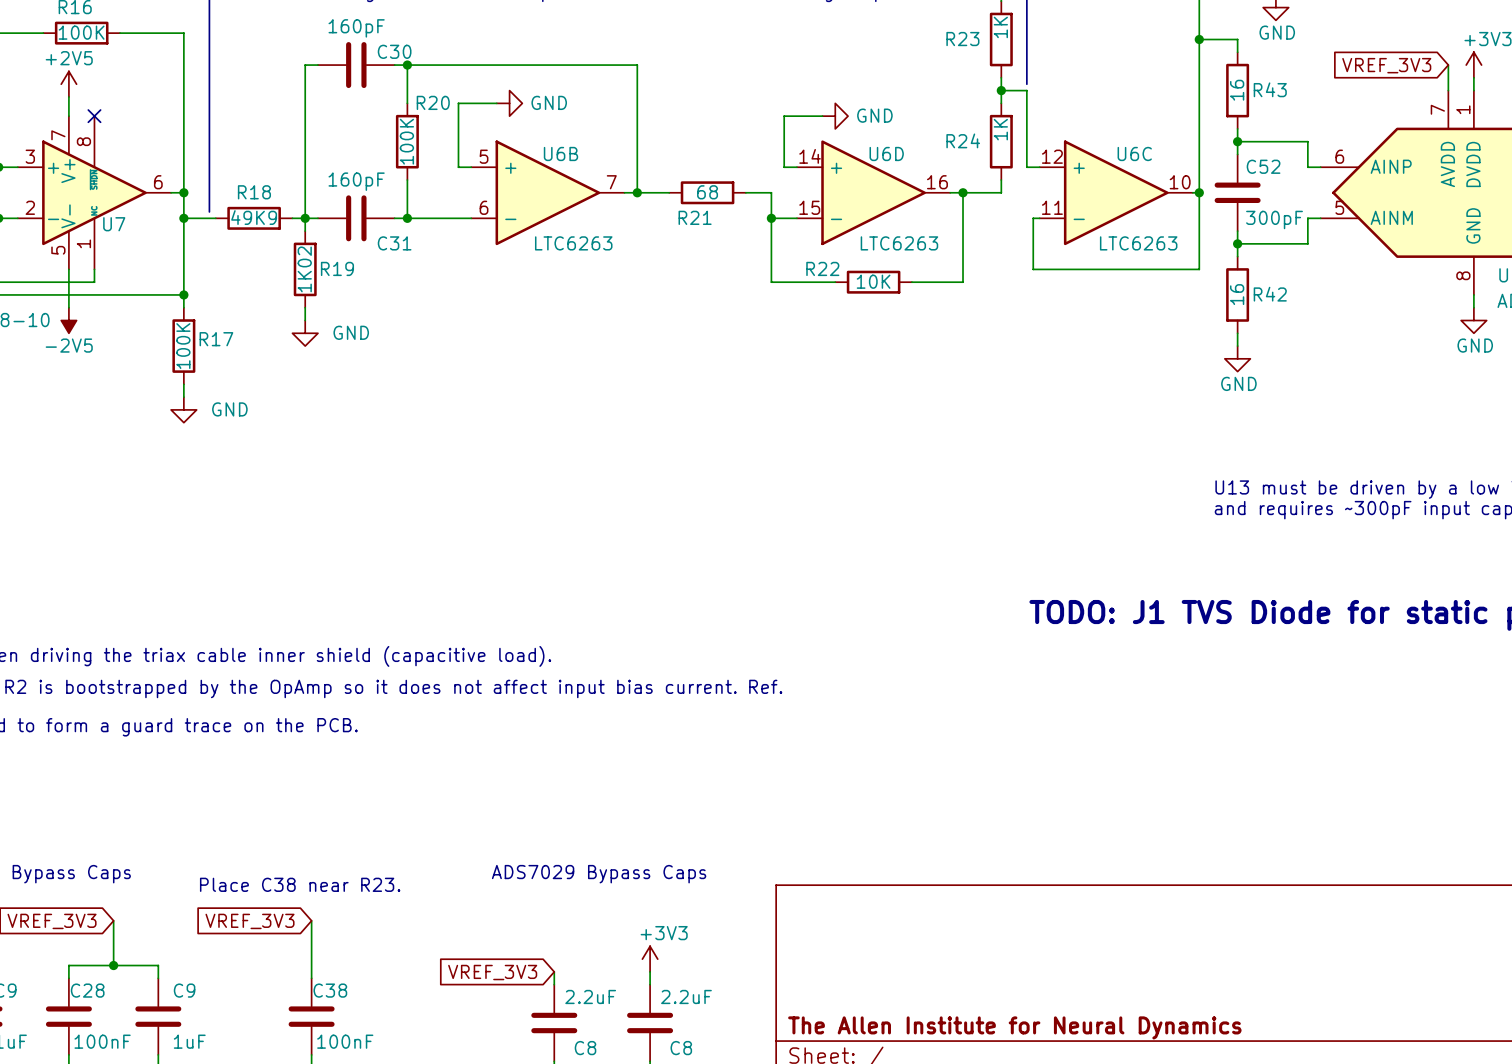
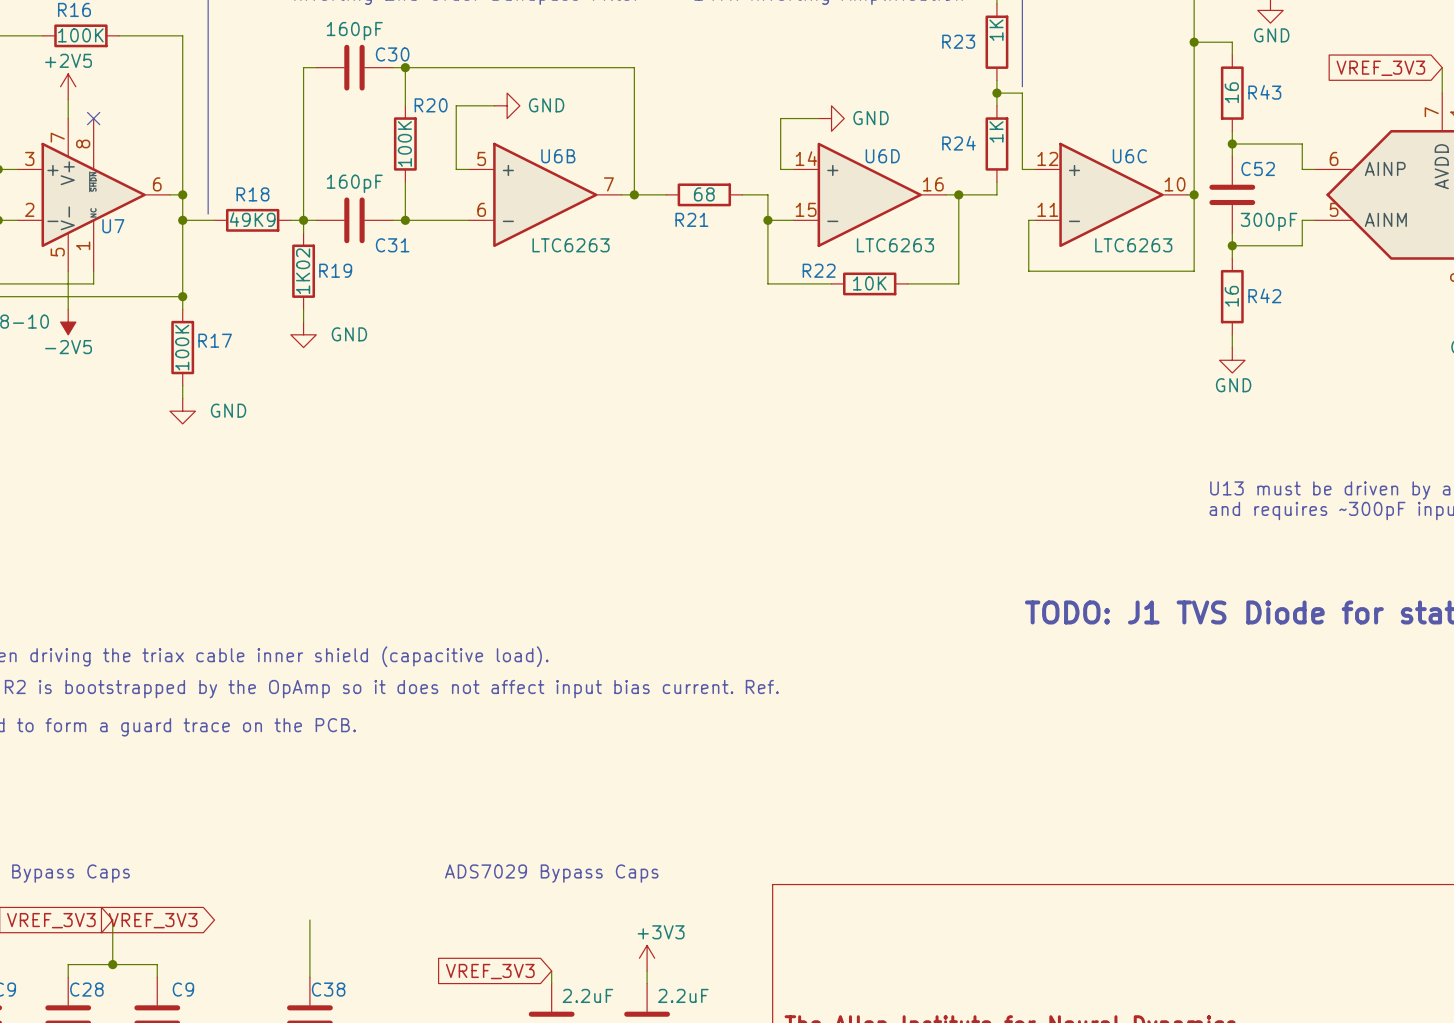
text position: ADS7029 Bypass Caps (599, 874) -> ADS7029 Bypass Caps (551, 873)
text: Place C38 near R23. (300, 884) -> none
global label position: VREF_3V3 (250, 921) -> VREF_3V3 (153, 920)

